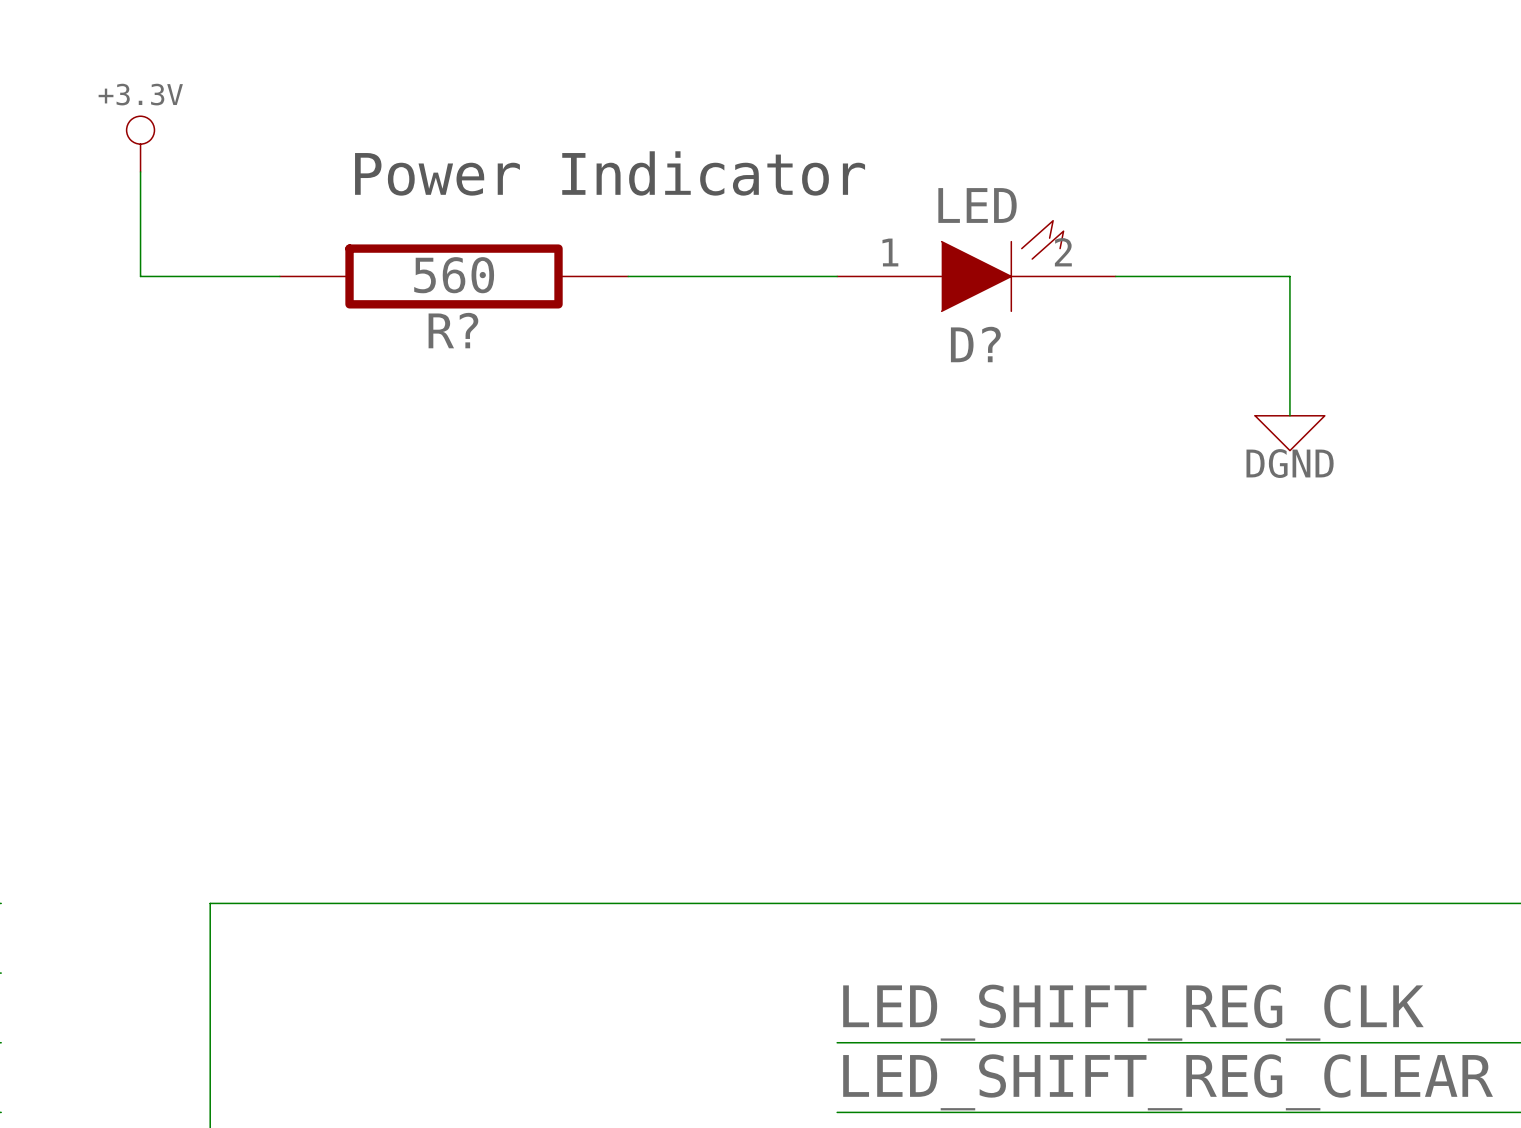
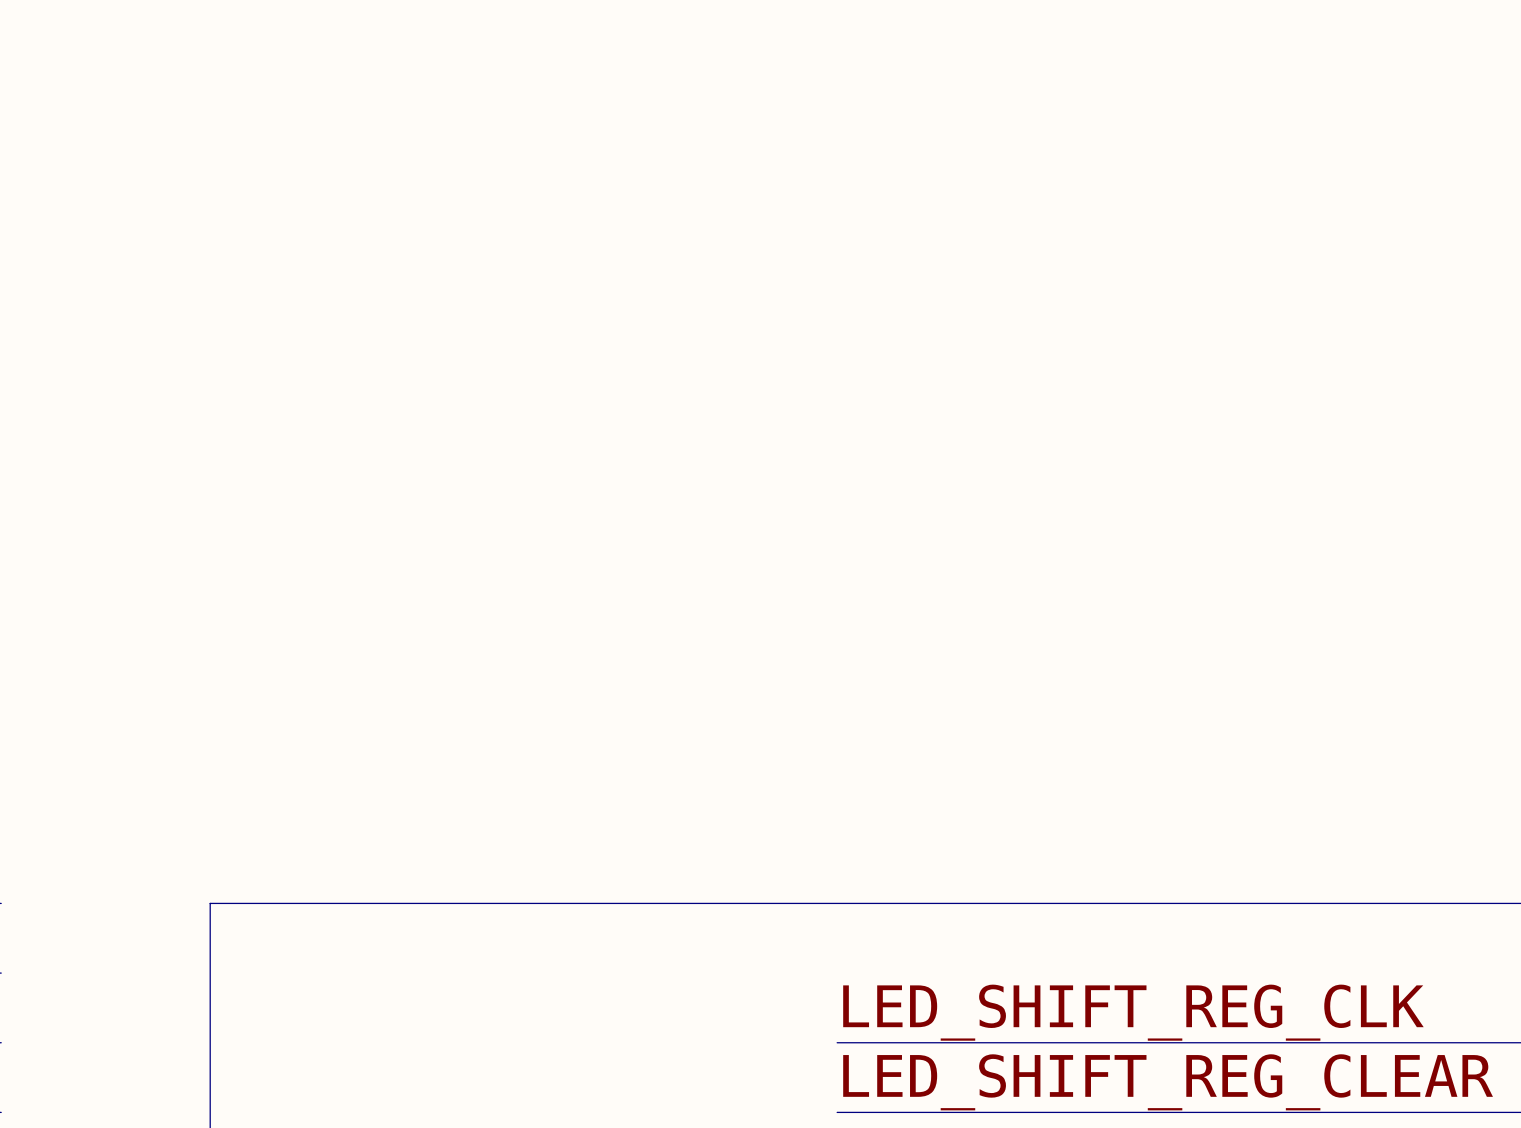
power symbol: +3.3V (140, 144) -> none
wire: (140, 171) (140, 276) (279, 276) -> none
text: Power Indicator (610, 173) -> none
D?: LED (976, 266) -> none
R?: 560 (454, 276) -> none
wire: (628, 276) (837, 276) -> none
wire: (1115, 276) (1289, 276) (1289, 415) -> none
power symbol: DGND (1289, 433) -> none

